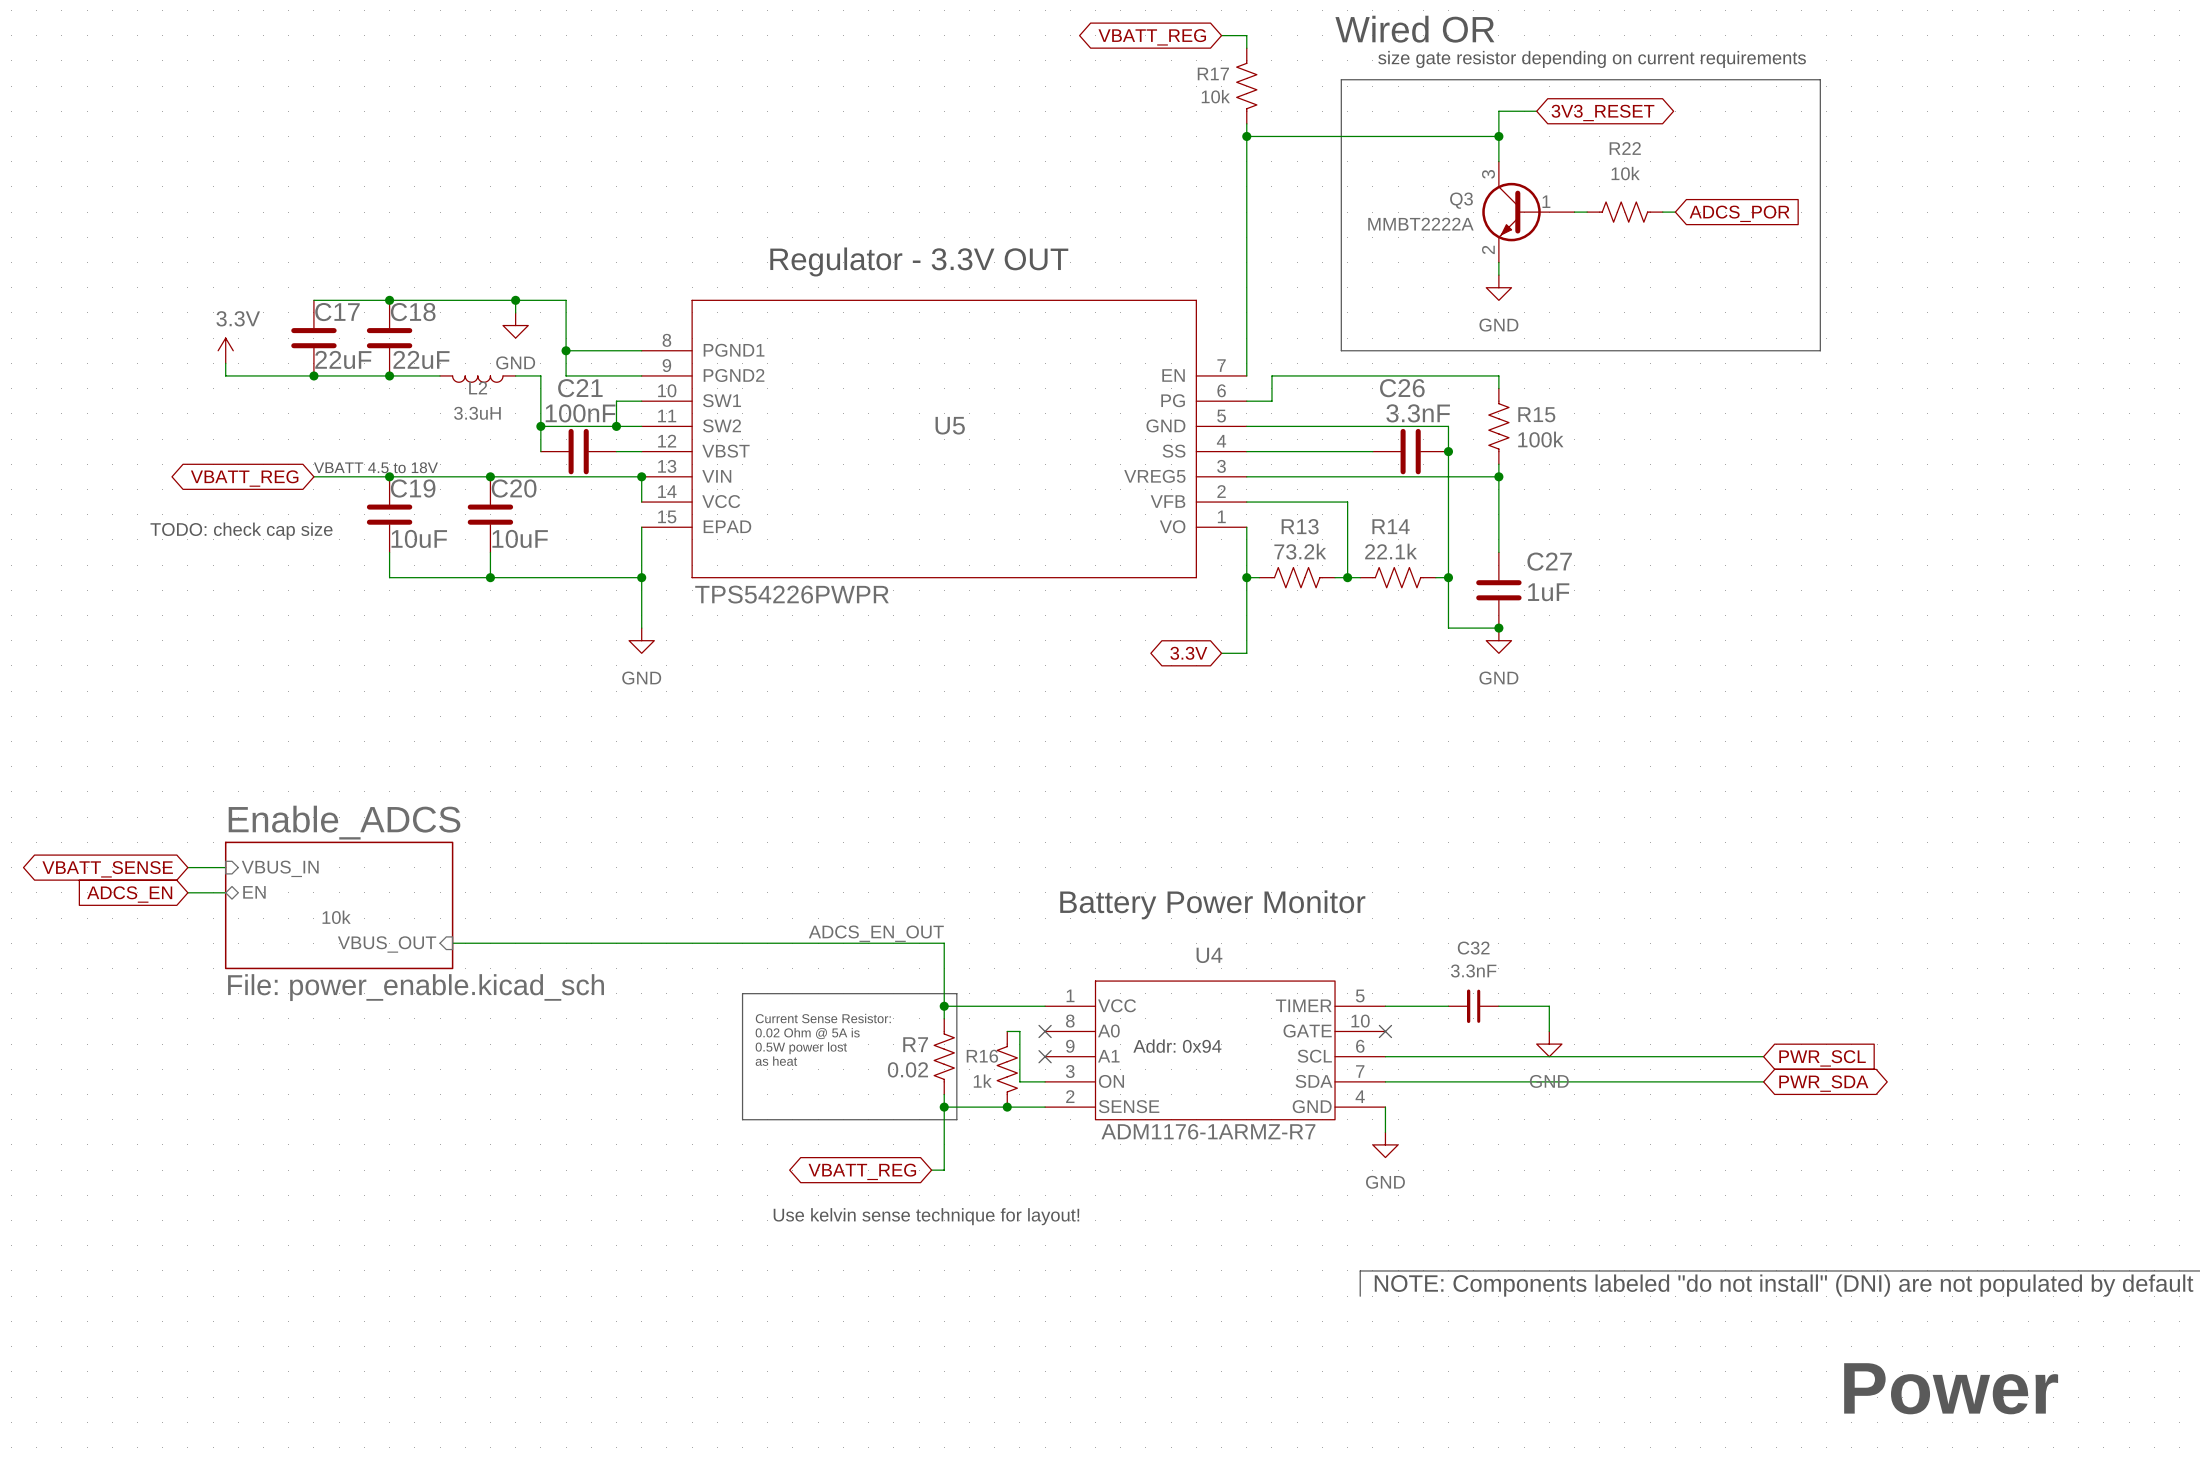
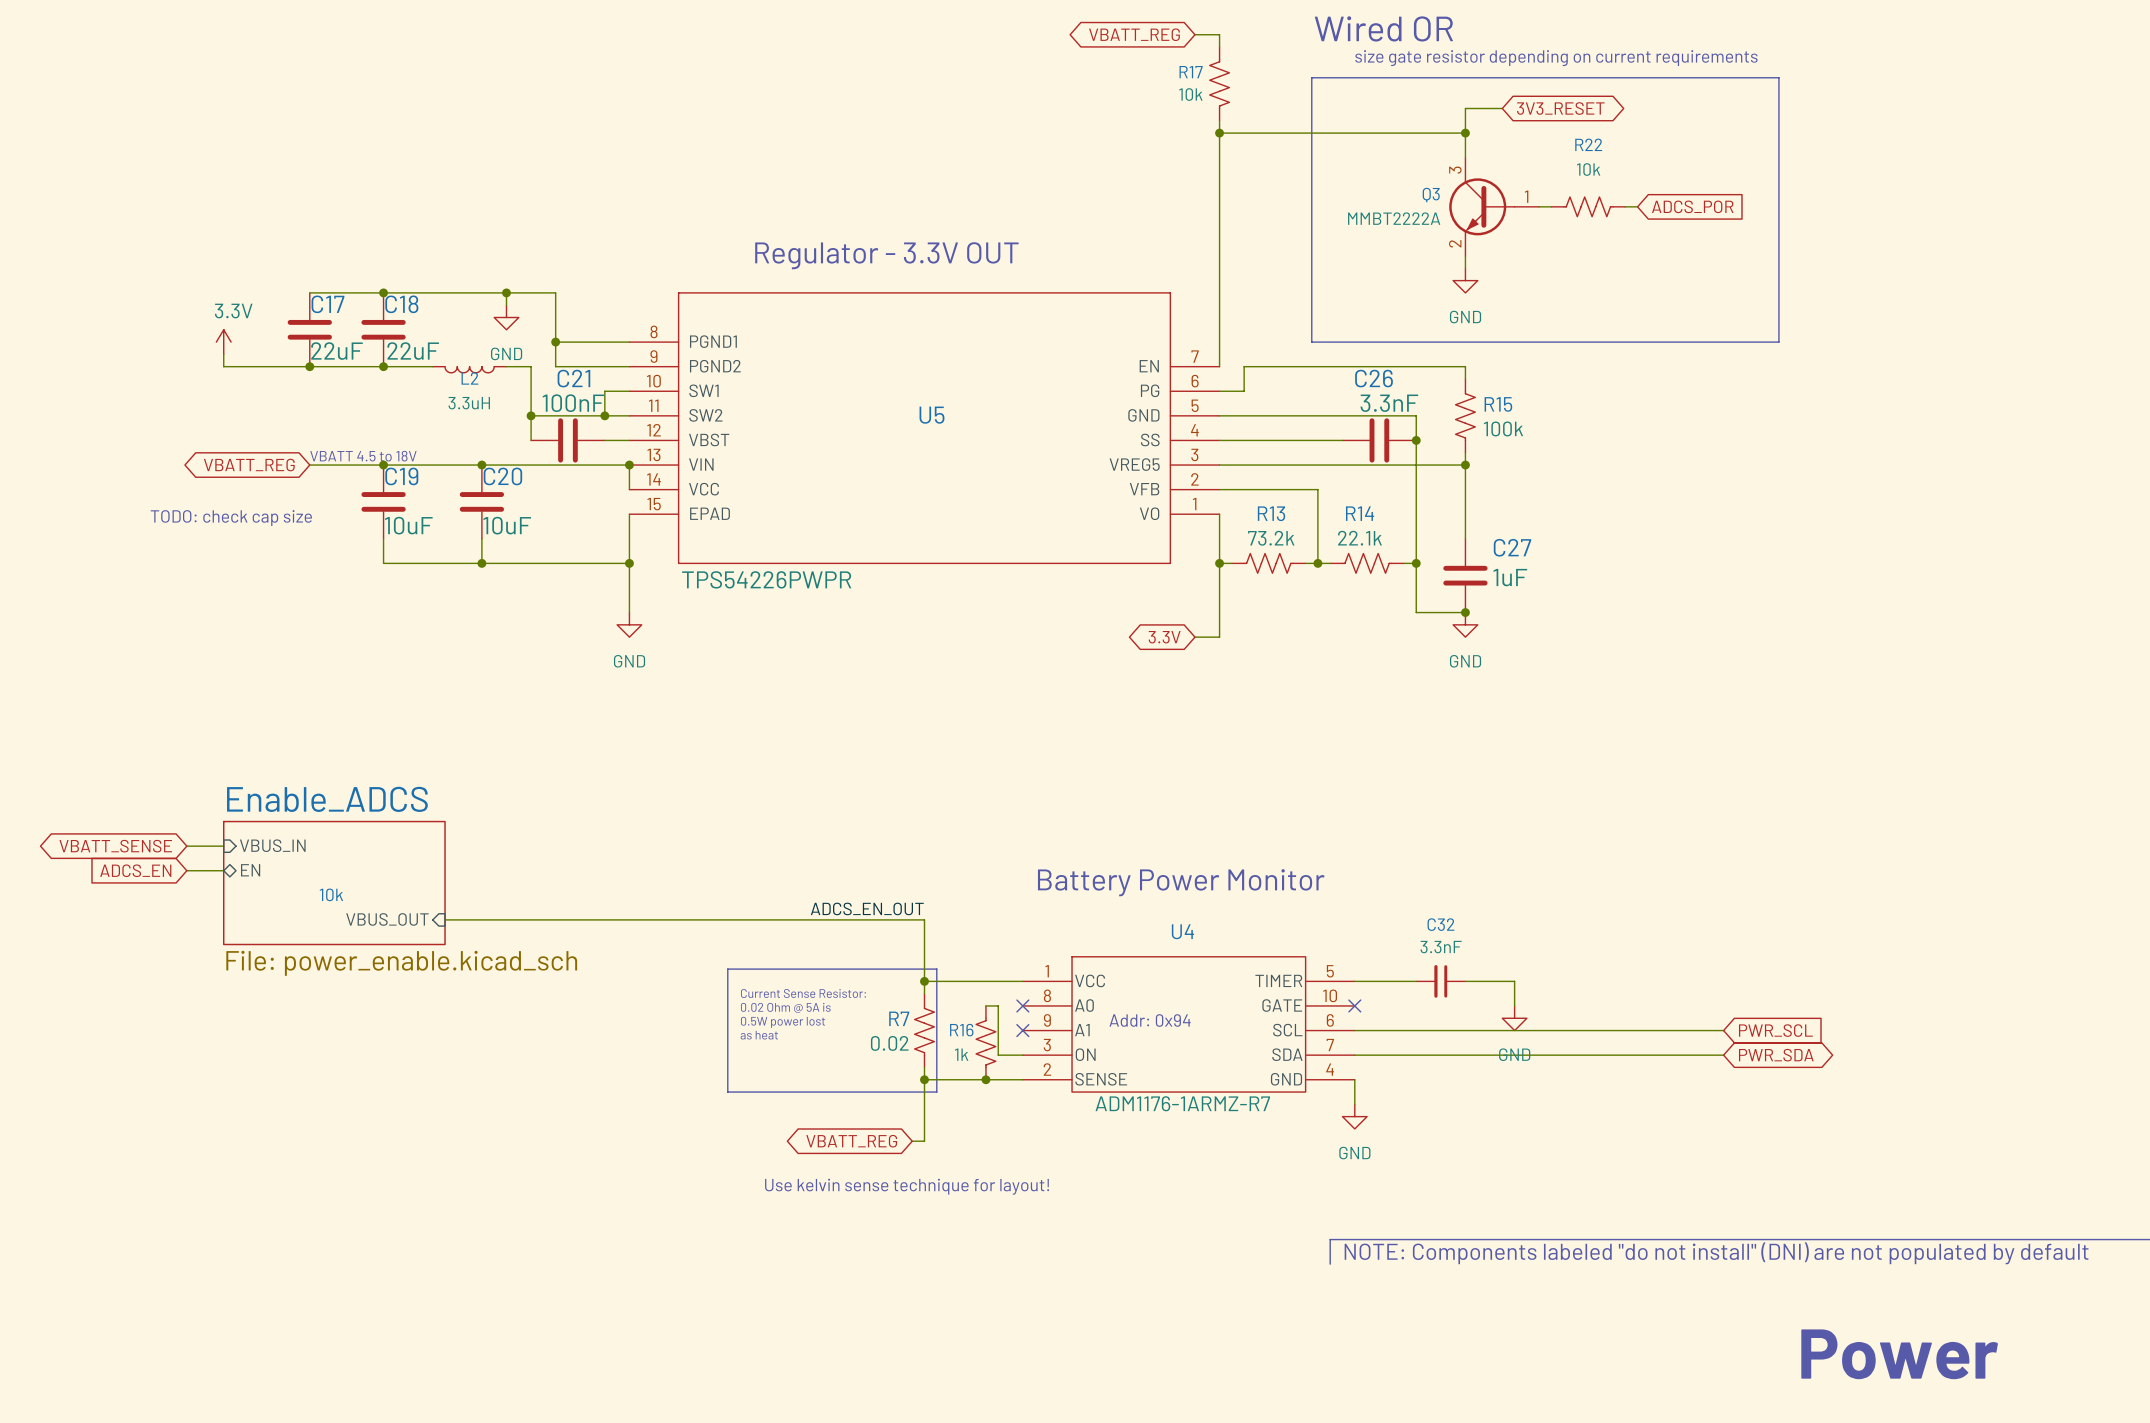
Q3 symbol: [1482, 161, 1575, 263] -> [1449, 157, 1540, 257]

